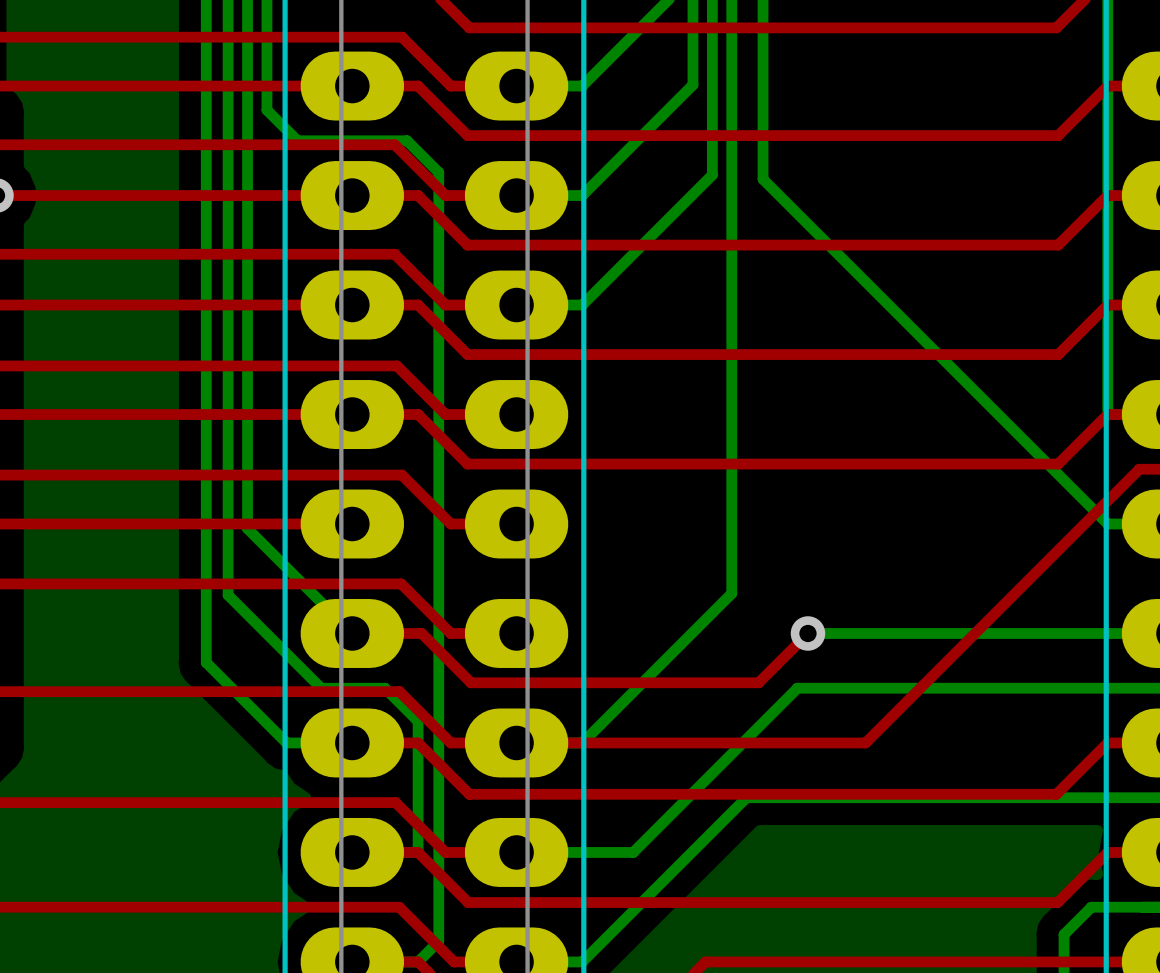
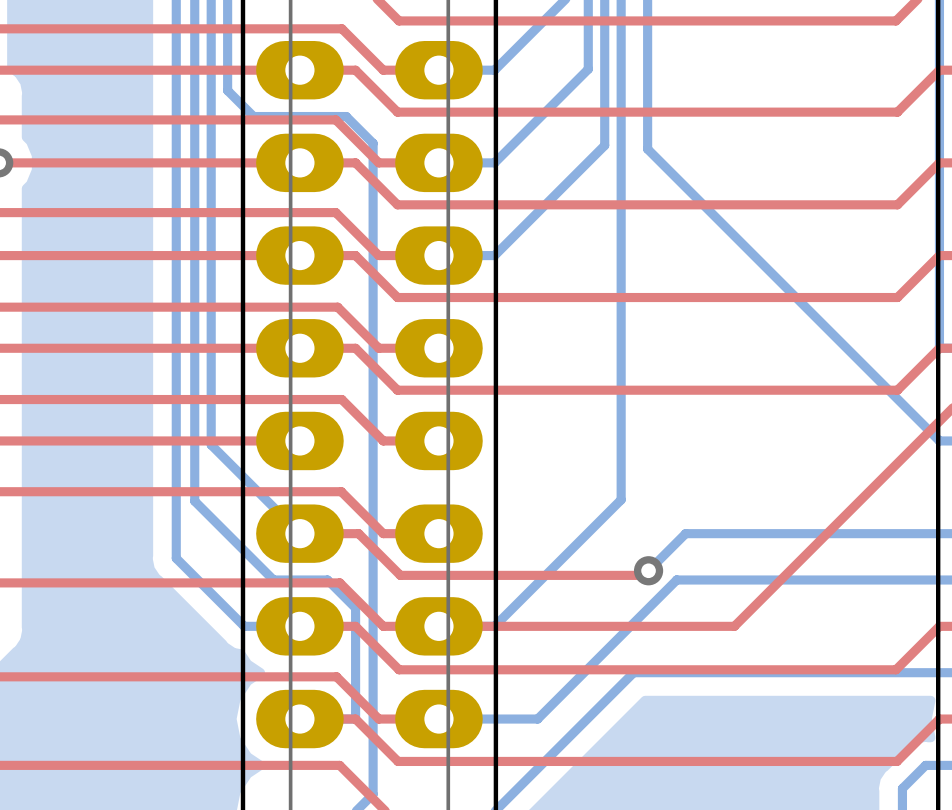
top track: (807, 633) (764, 677) -> none
bottom track: none -> (685, 533) (648, 570)
via position: (807, 633) -> (648, 570)

